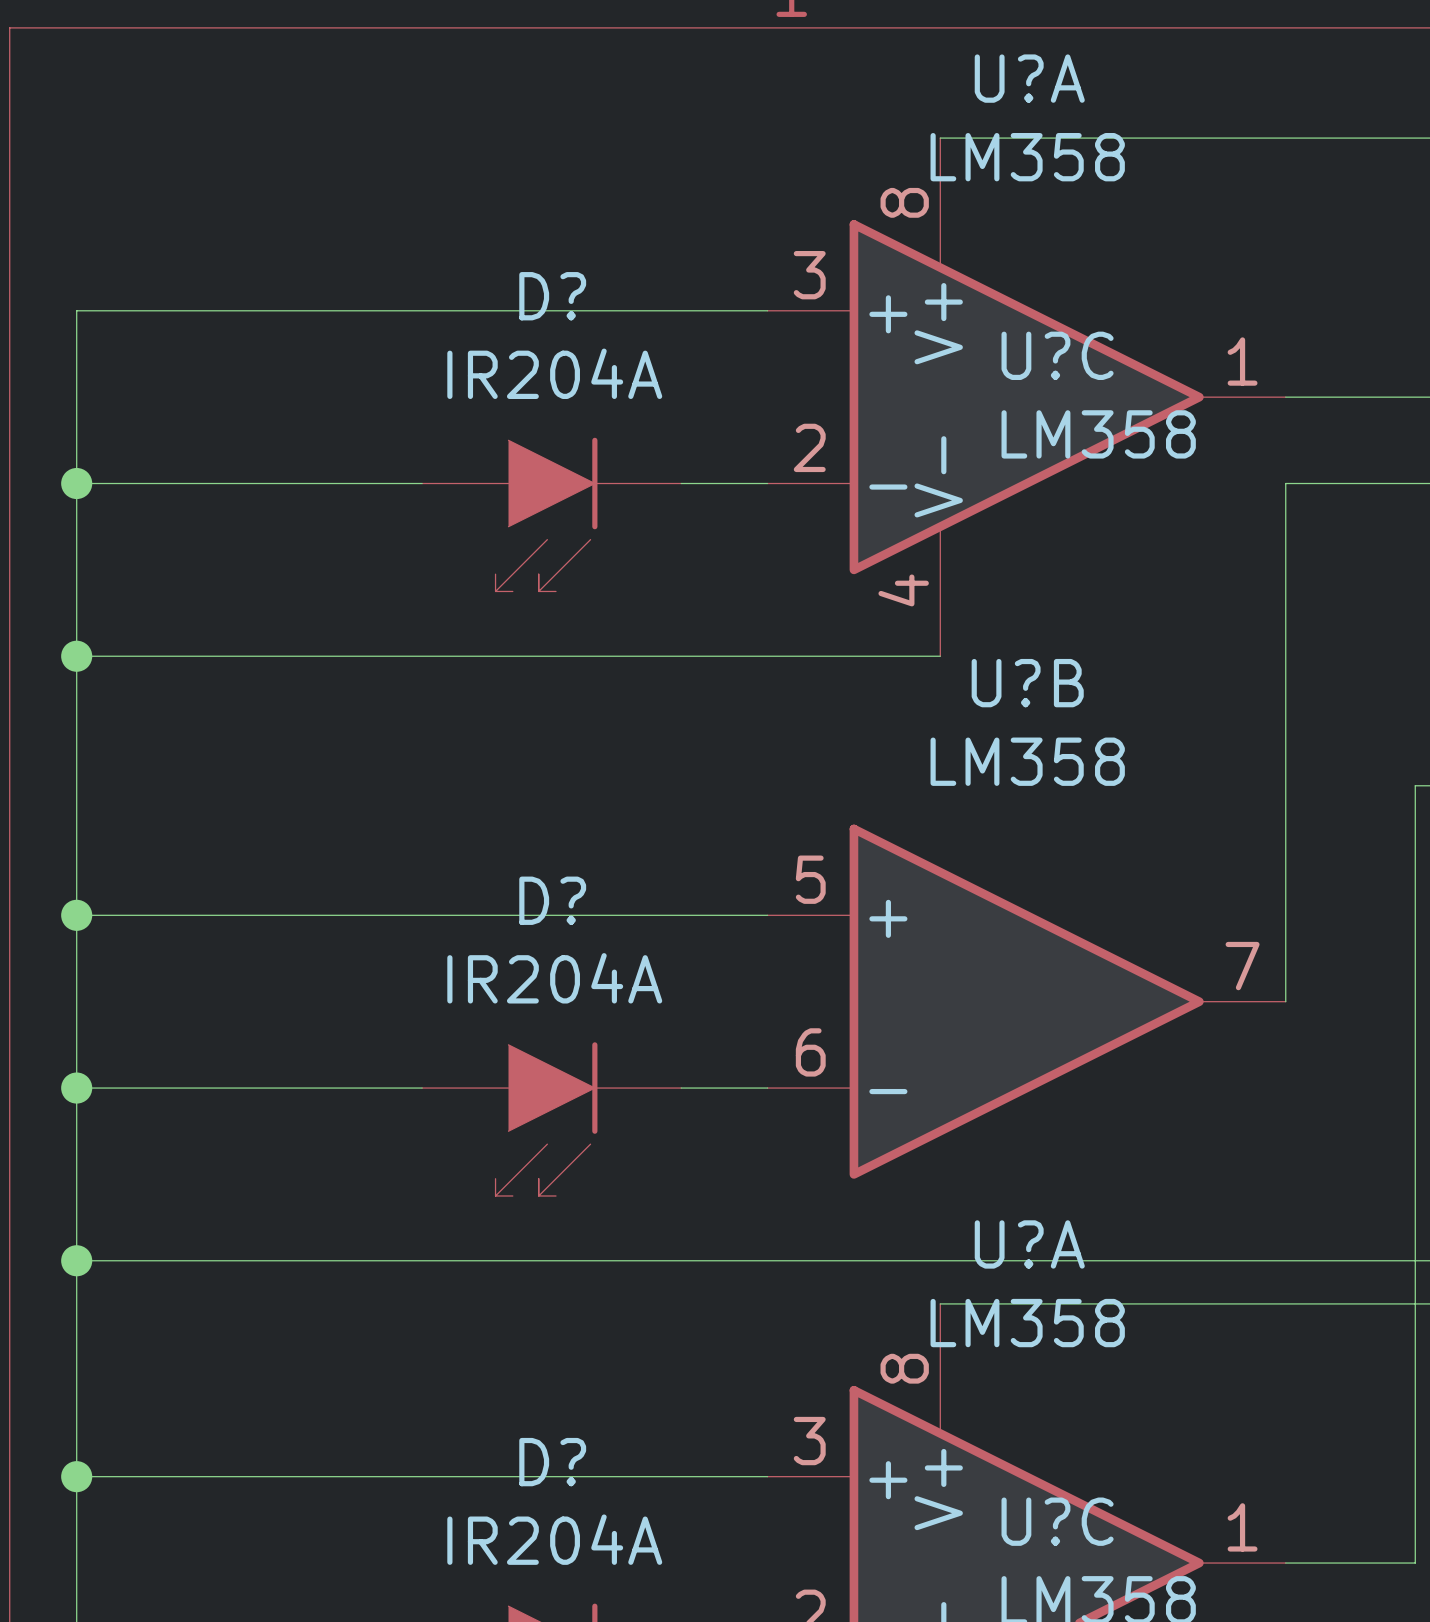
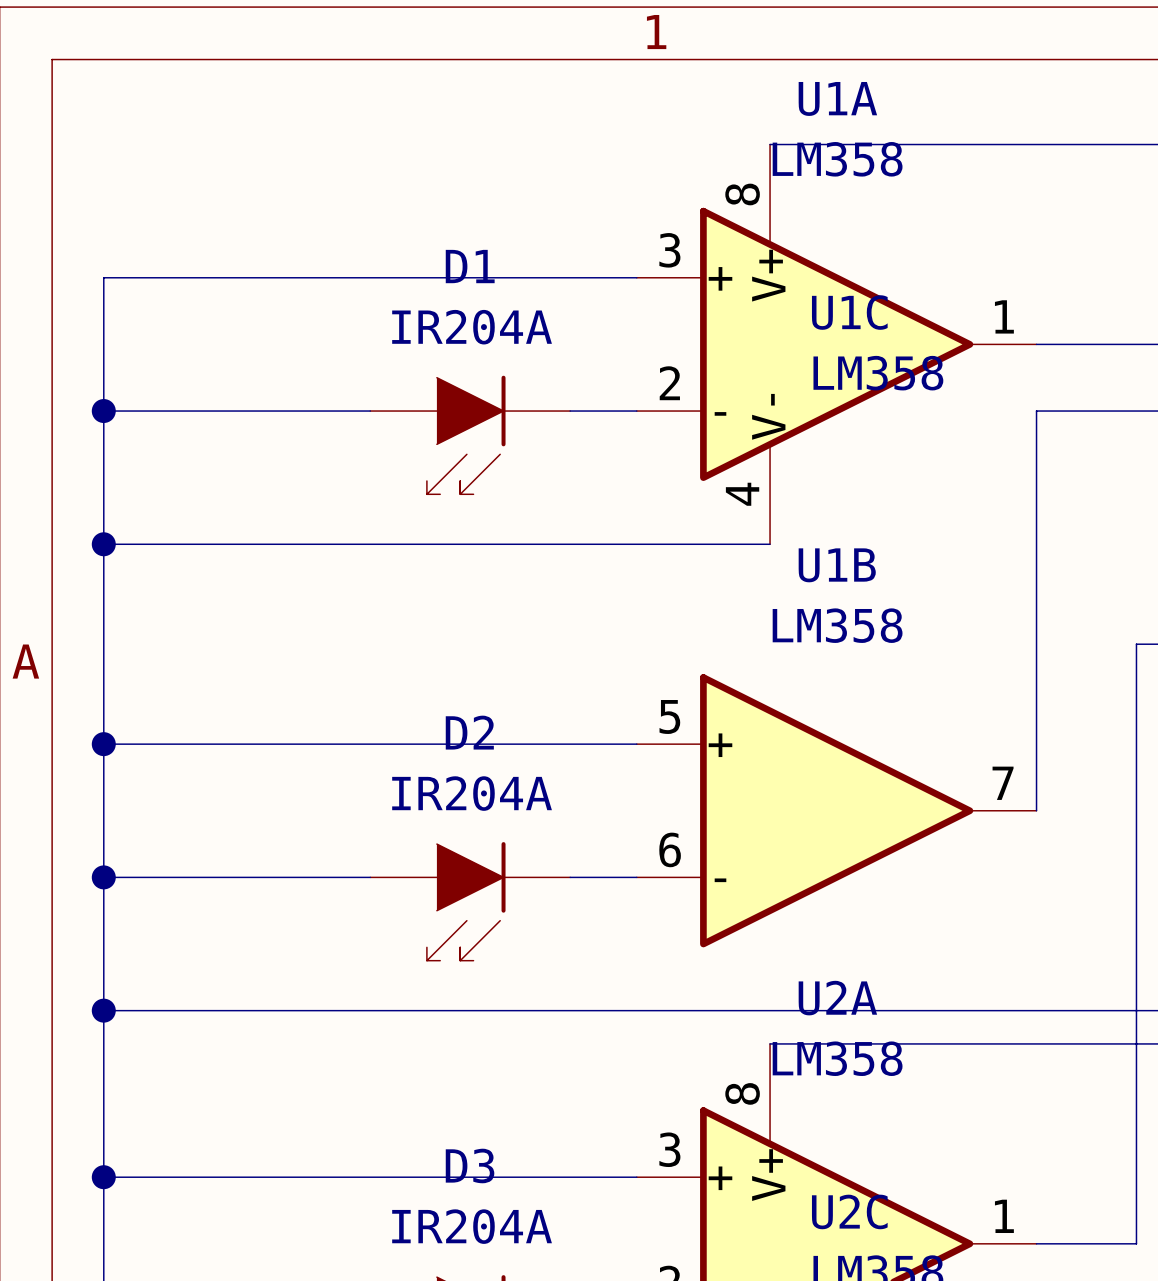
U?A name: U?A (1029, 78) -> U1A (837, 98)
D? name: D? (552, 296) -> D1 (470, 266)
U?C name: U?C (1057, 355) -> U1C (849, 312)
U?B name: U?B (1027, 683) -> U1B (837, 565)
D? name: D? (552, 900) -> D2 (469, 732)
U?A name: U?A (1029, 1244) -> U2A (837, 998)
D? name: D? (552, 1462) -> D3 (470, 1165)
U?C name: U?C (1057, 1521) -> U2C (849, 1211)

